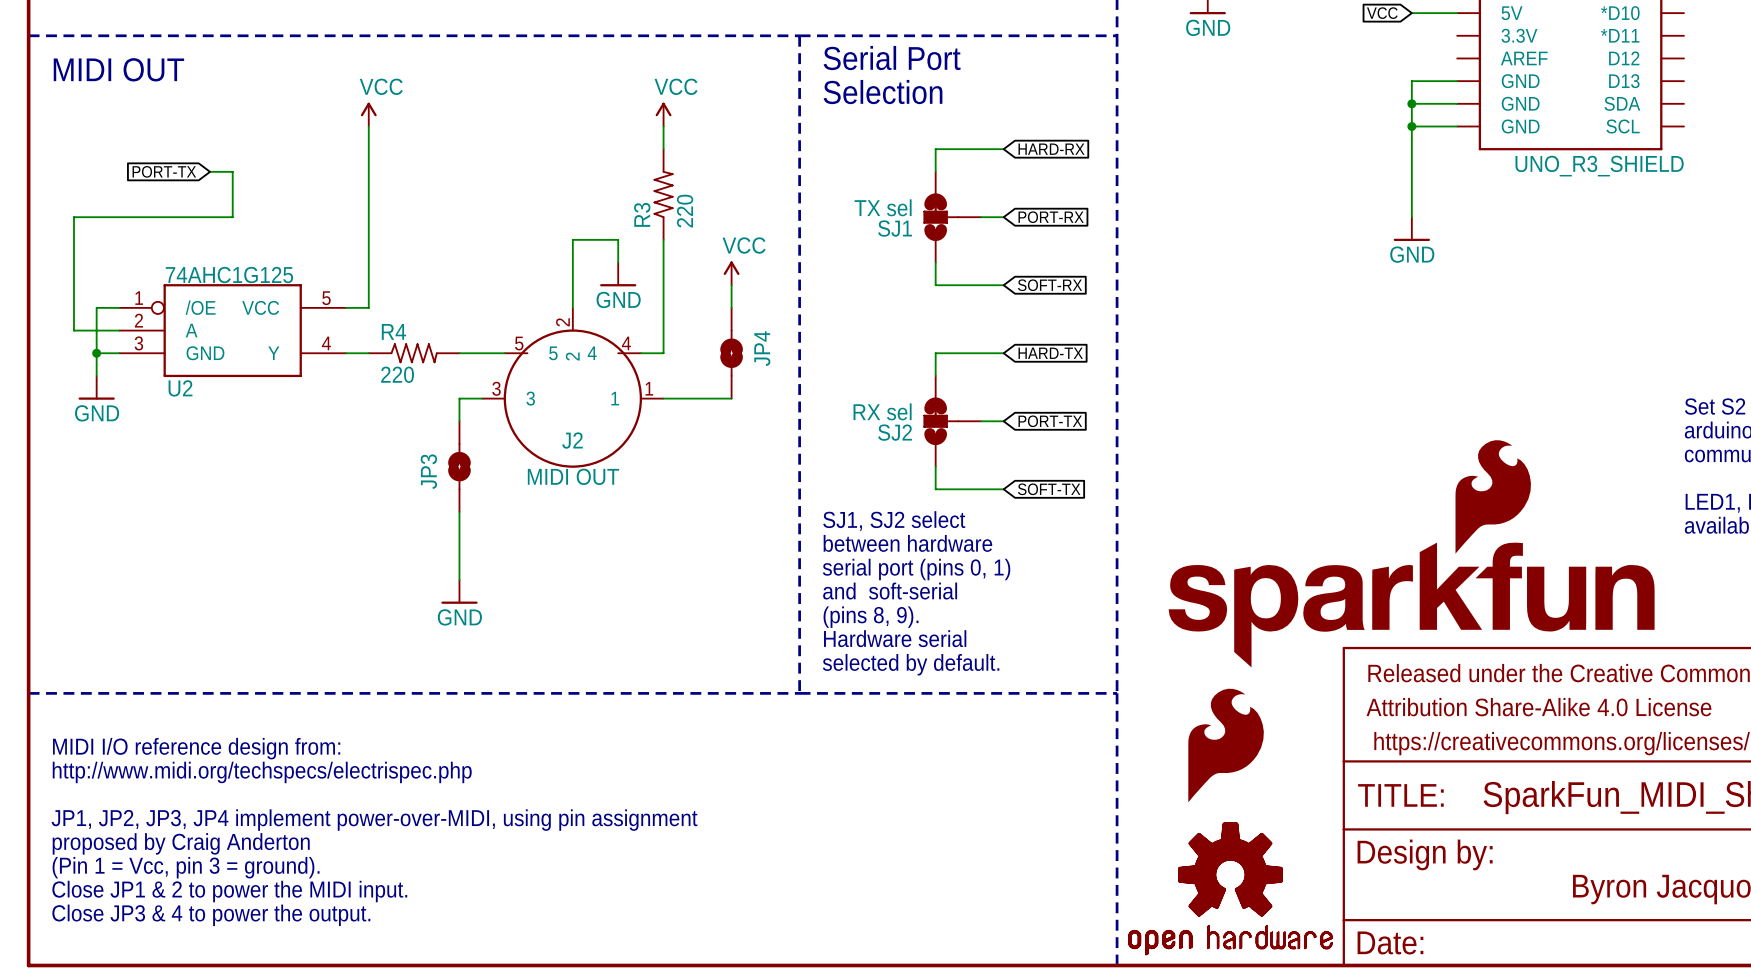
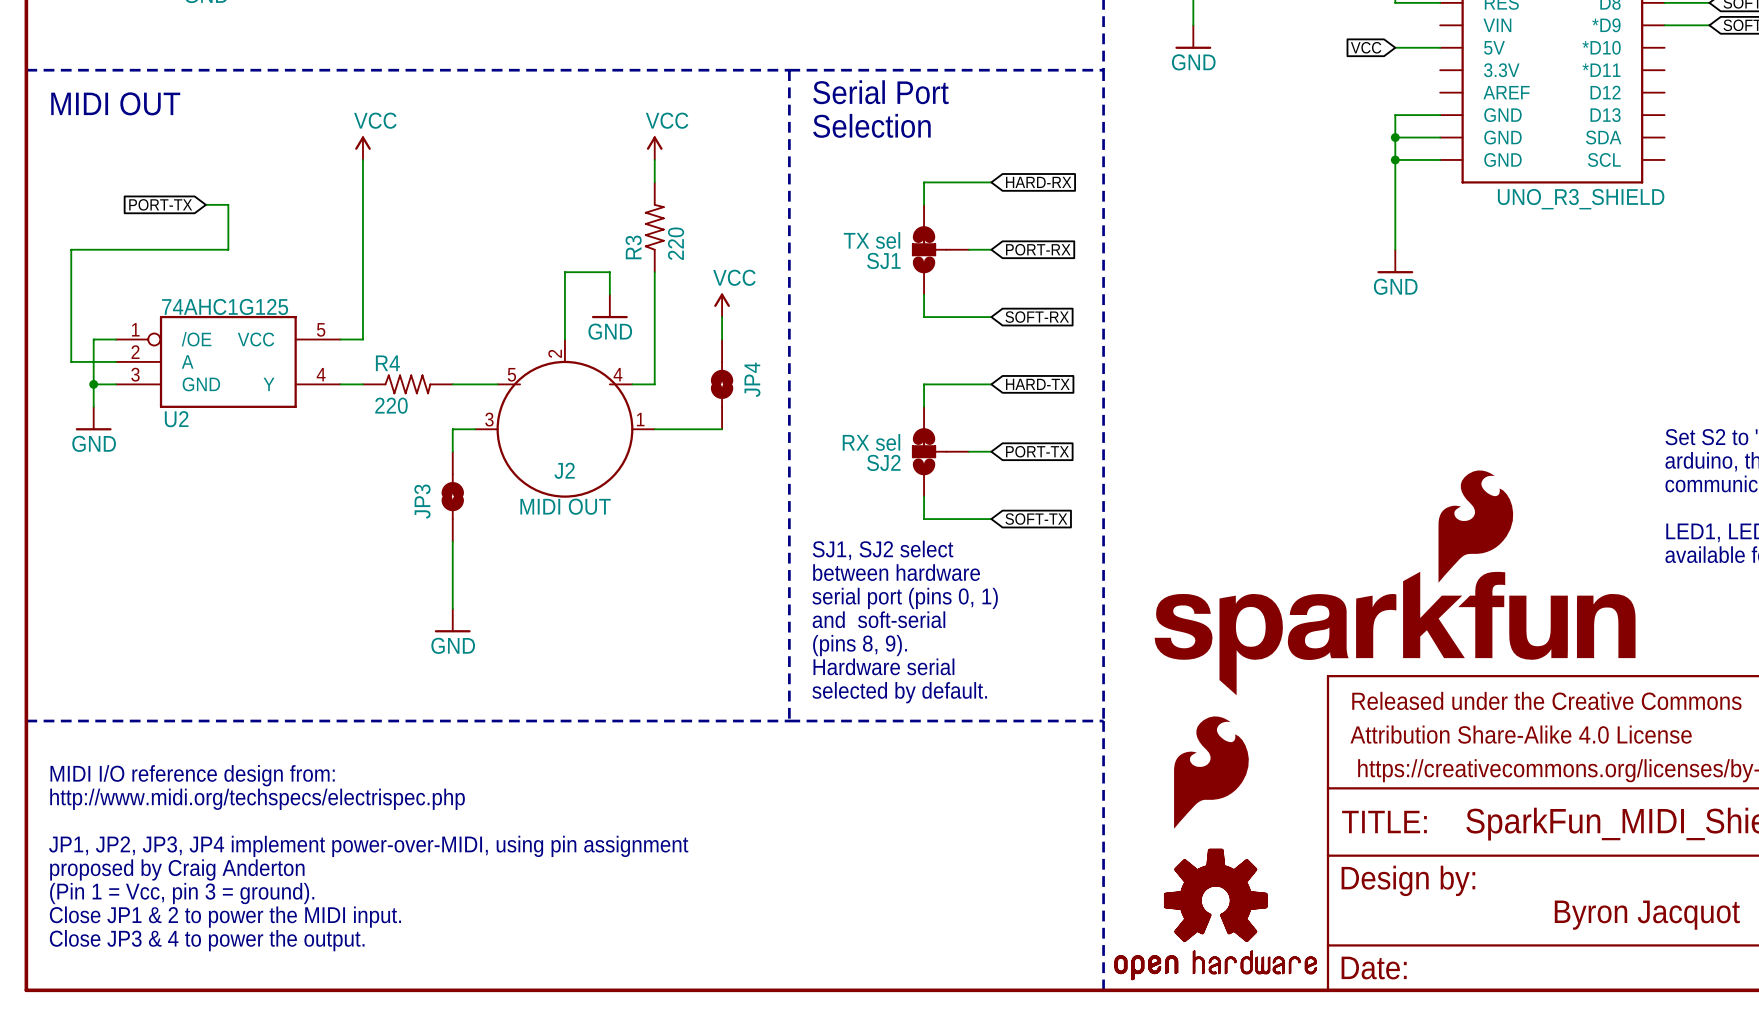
J2 pin name: 5 (553, 353) -> none
J2 pin name: 4 (592, 353) -> none
J2 pin name: 2 (572, 356) -> none
J2 pin name: 3 (530, 398) -> none
J2 pin name: 1 (615, 398) -> none

